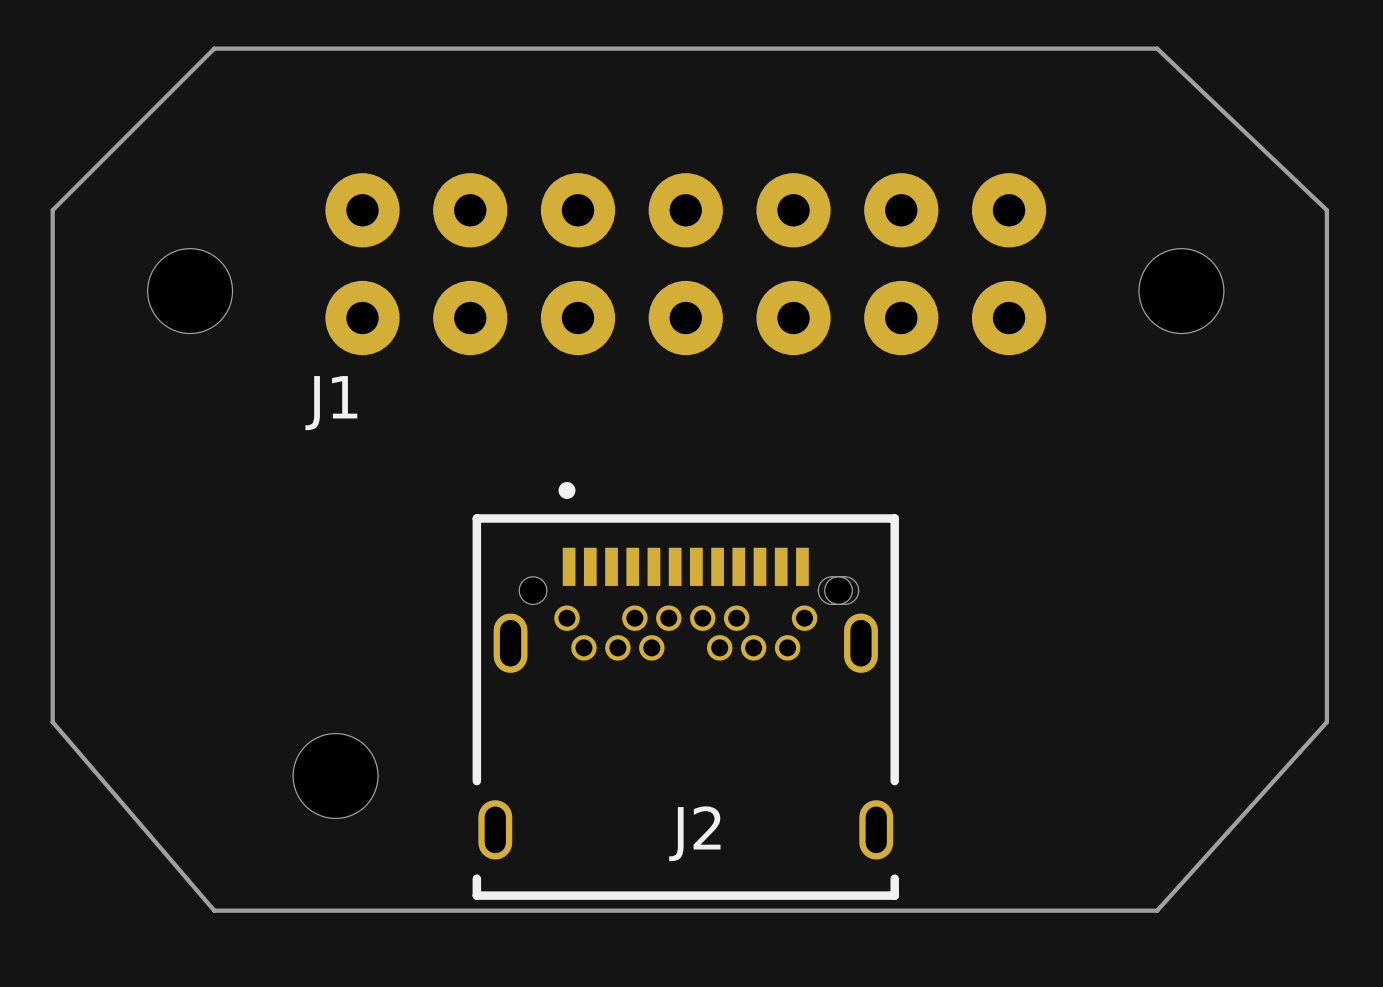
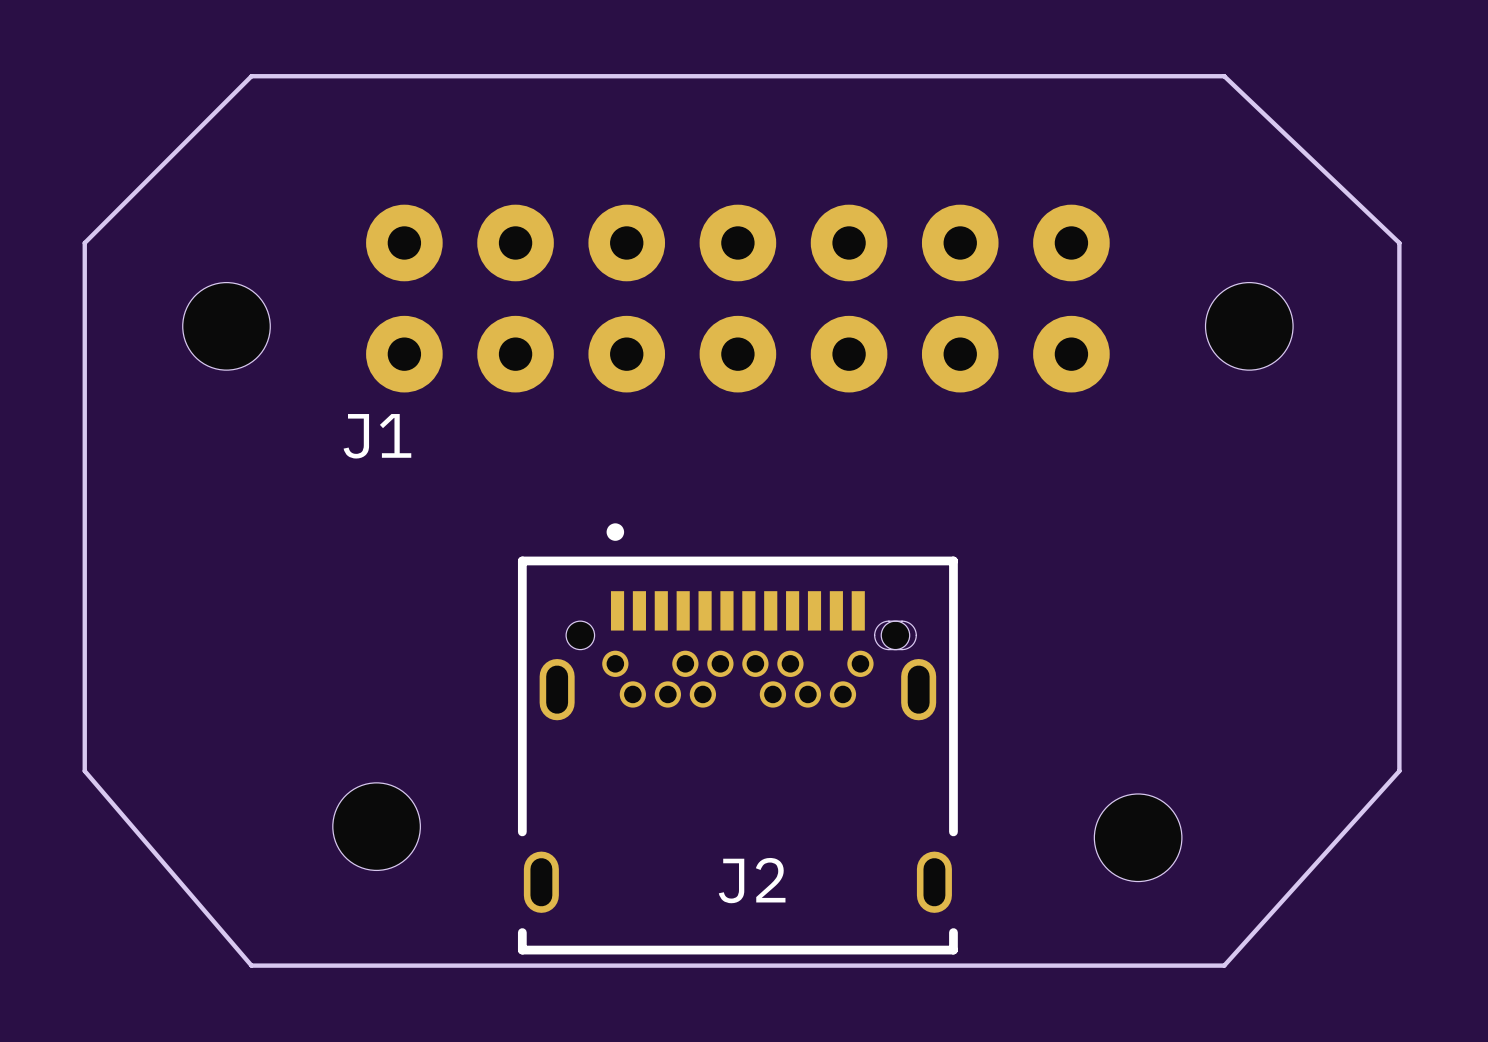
part: none -> (1138, 837)

